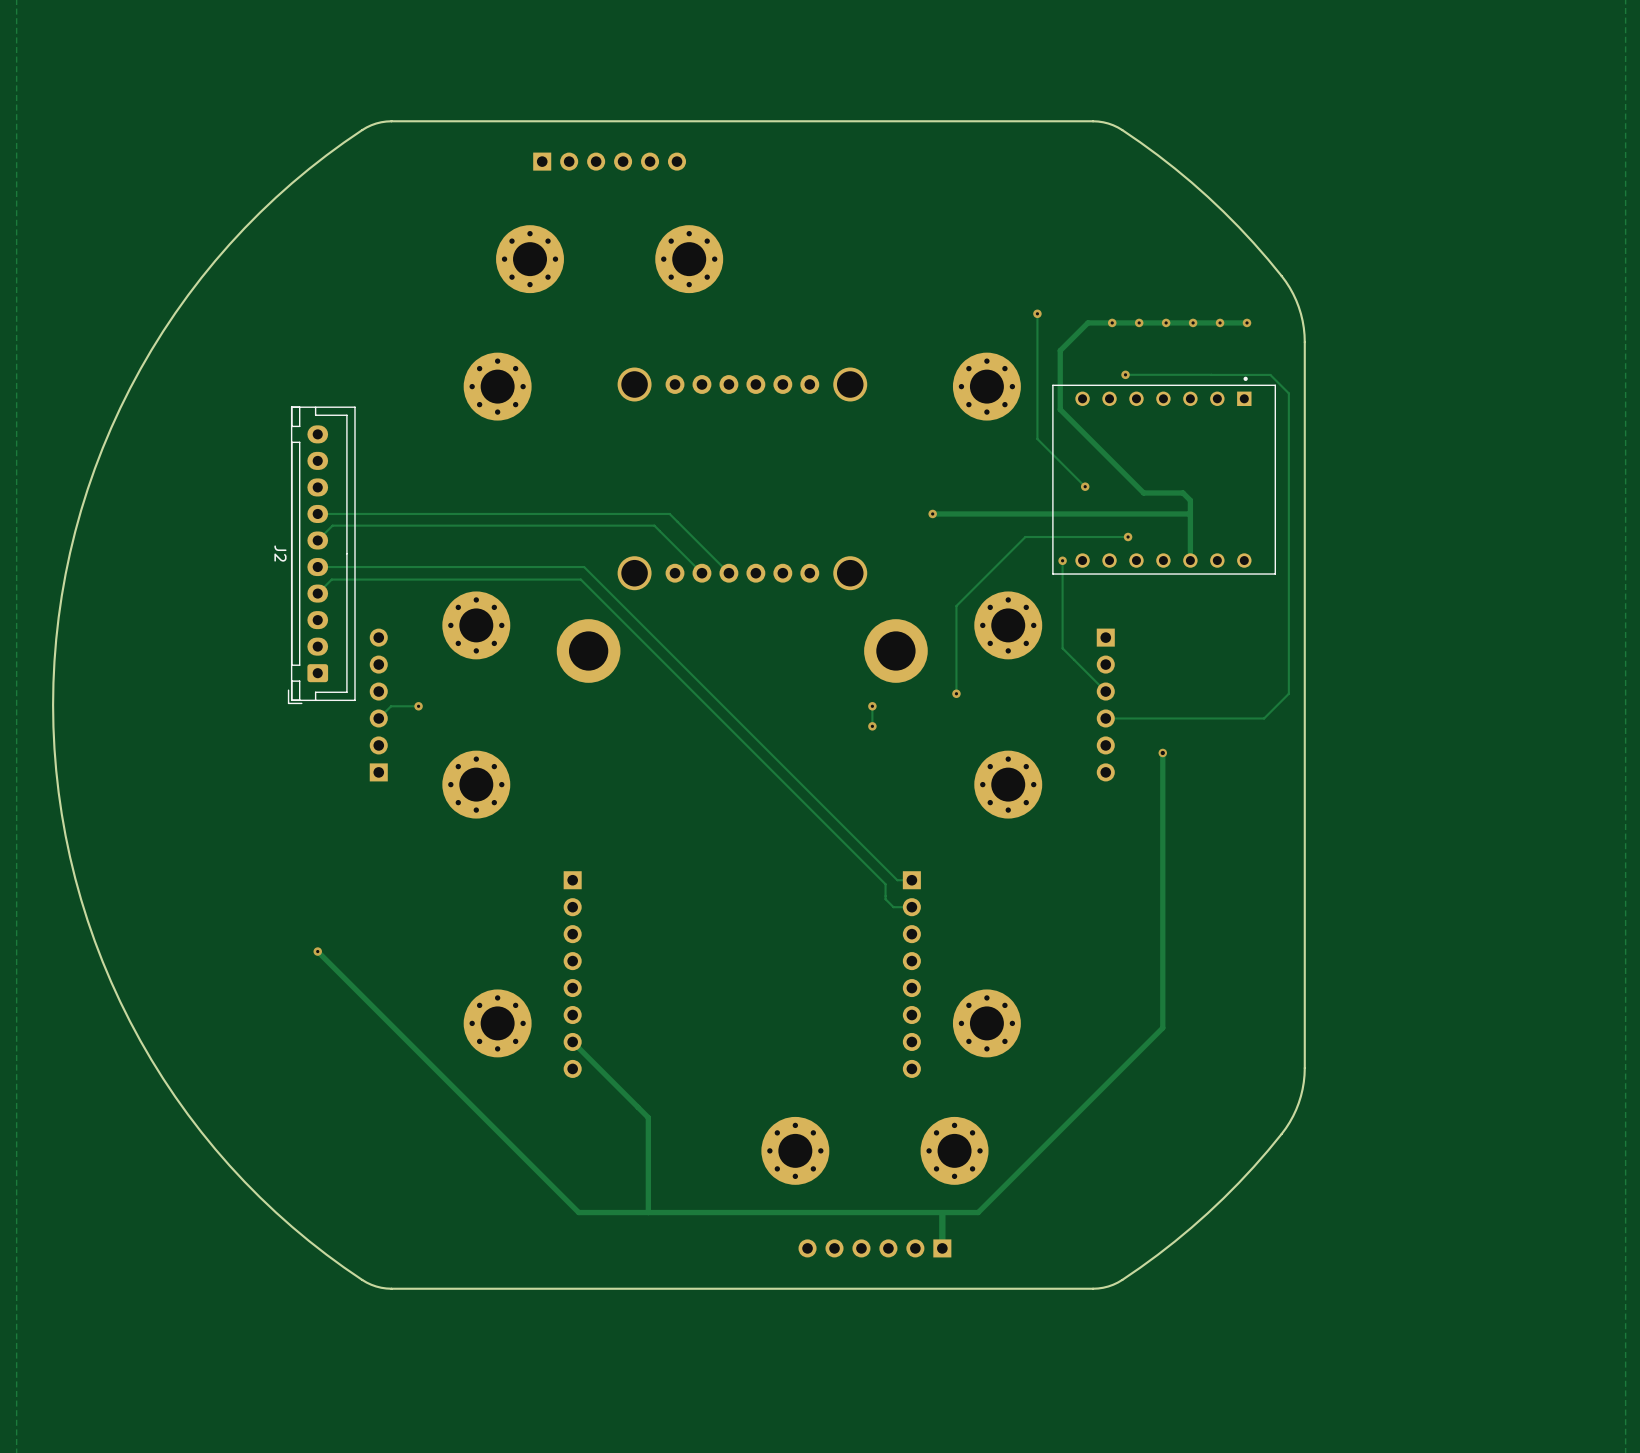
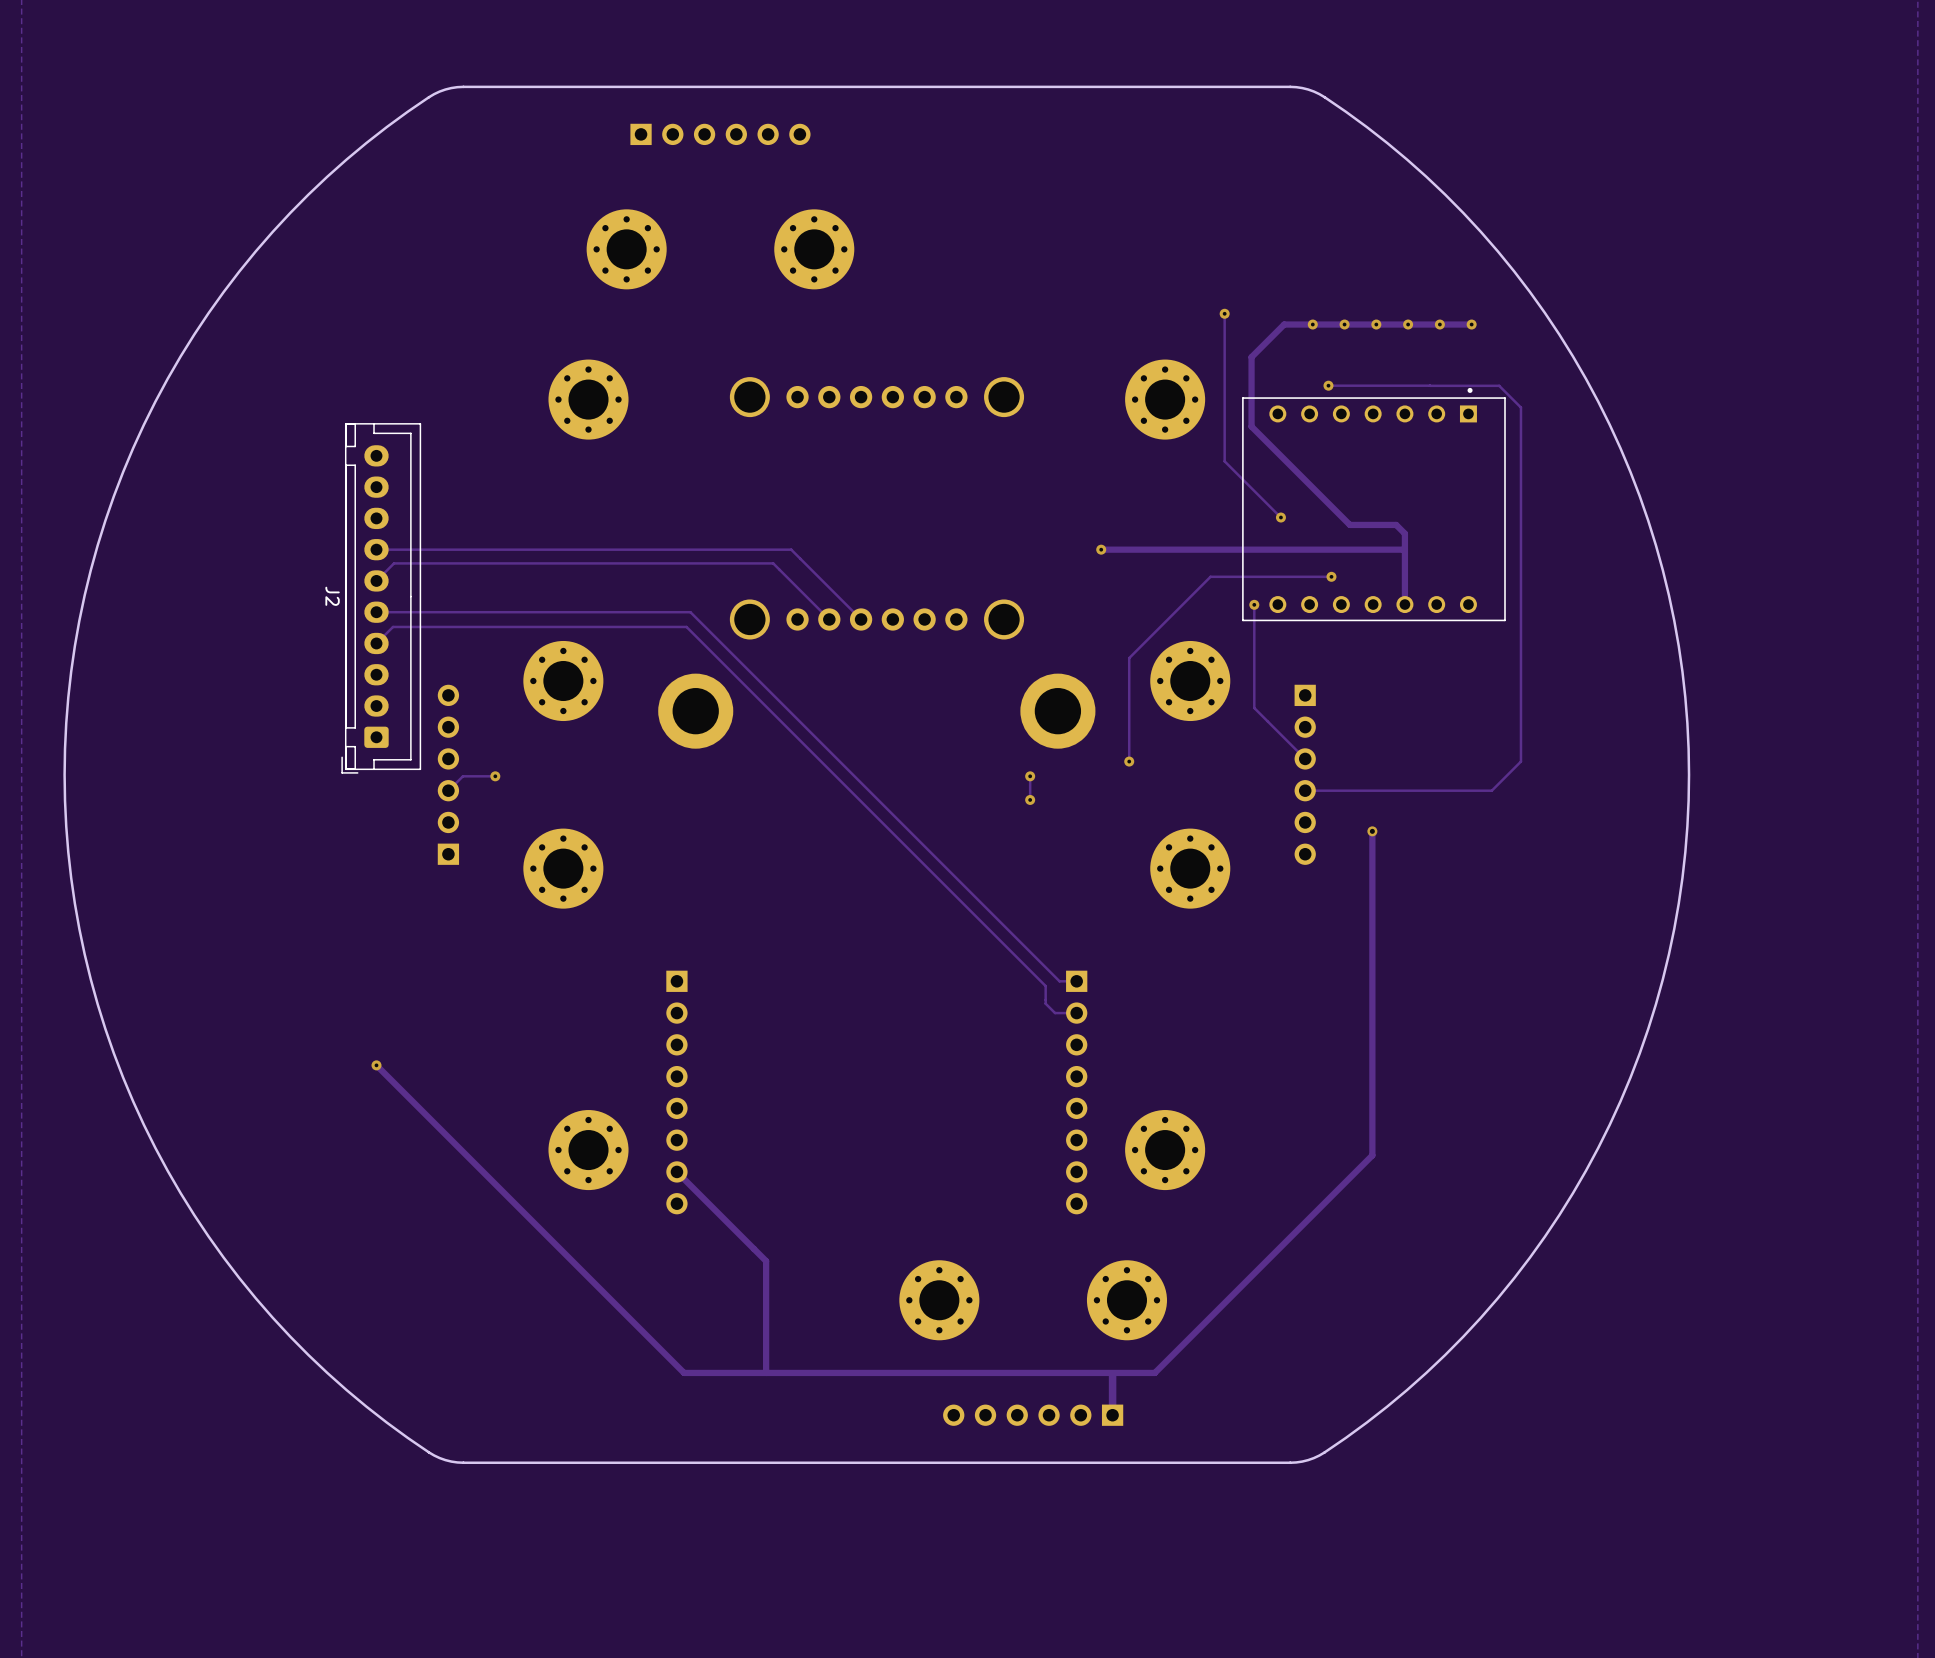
board edge: (1122, 130) (1174, 168) (1207, 196) (1267, 259) (1285, 281) (1296, 300) (1302, 320) (1304, 342) (1304, 1068) (1302, 1089) (1296, 1109) (1285, 1128) (1238, 1182) (1174, 1241) (1122, 1279) -> (1324, 97) (1366, 127) (1407, 159) (1463, 212) (1497, 251) (1529, 291) (1559, 334) (1585, 378) (1609, 424) (1630, 472) (1648, 520) (1662, 570) (1674, 620) (1682, 671) (1687, 723) (1689, 774) (1687, 826) (1682, 877) (1668, 954) (1655, 1004) (1639, 1053) (1620, 1101) (1598, 1148) (1572, 1193) (1544, 1236) (1514, 1278) (1480, 1317) (1445, 1355) (1407, 1390) (1366, 1422) (1324, 1452)

